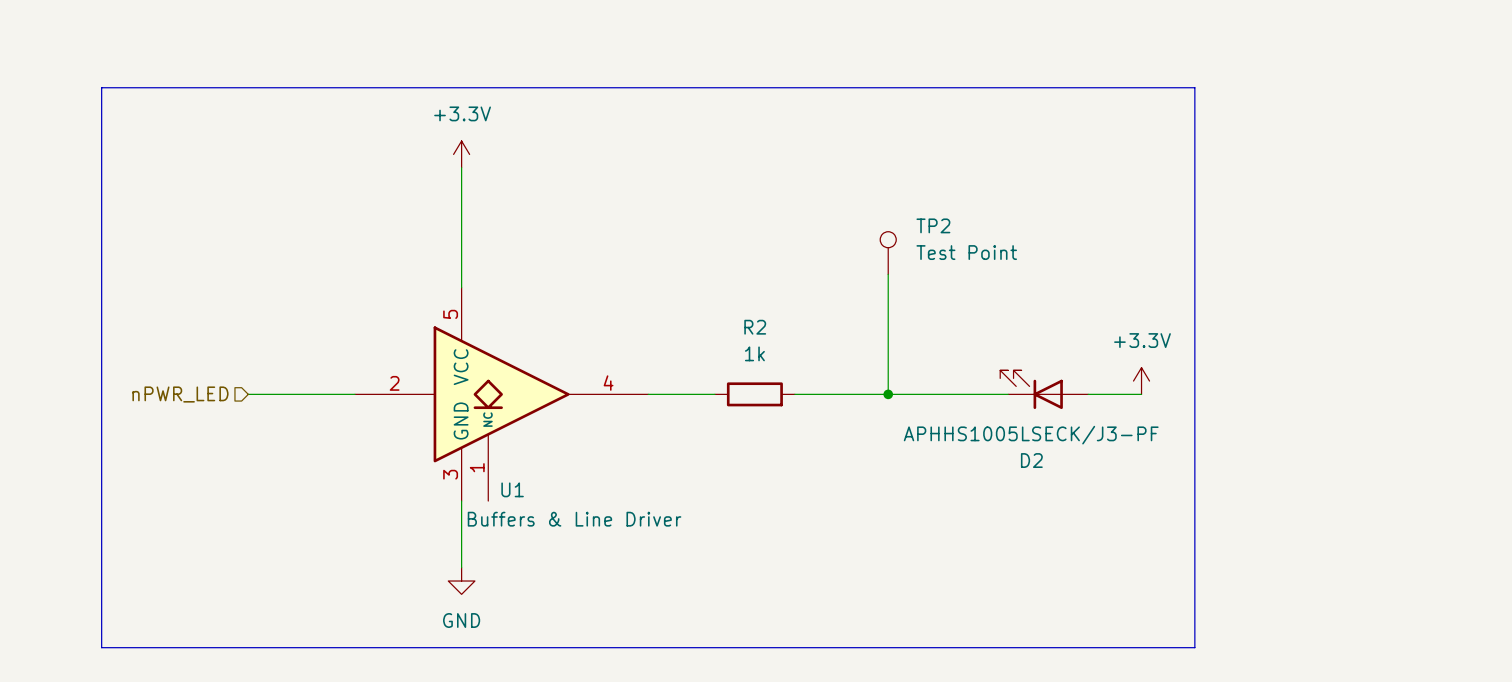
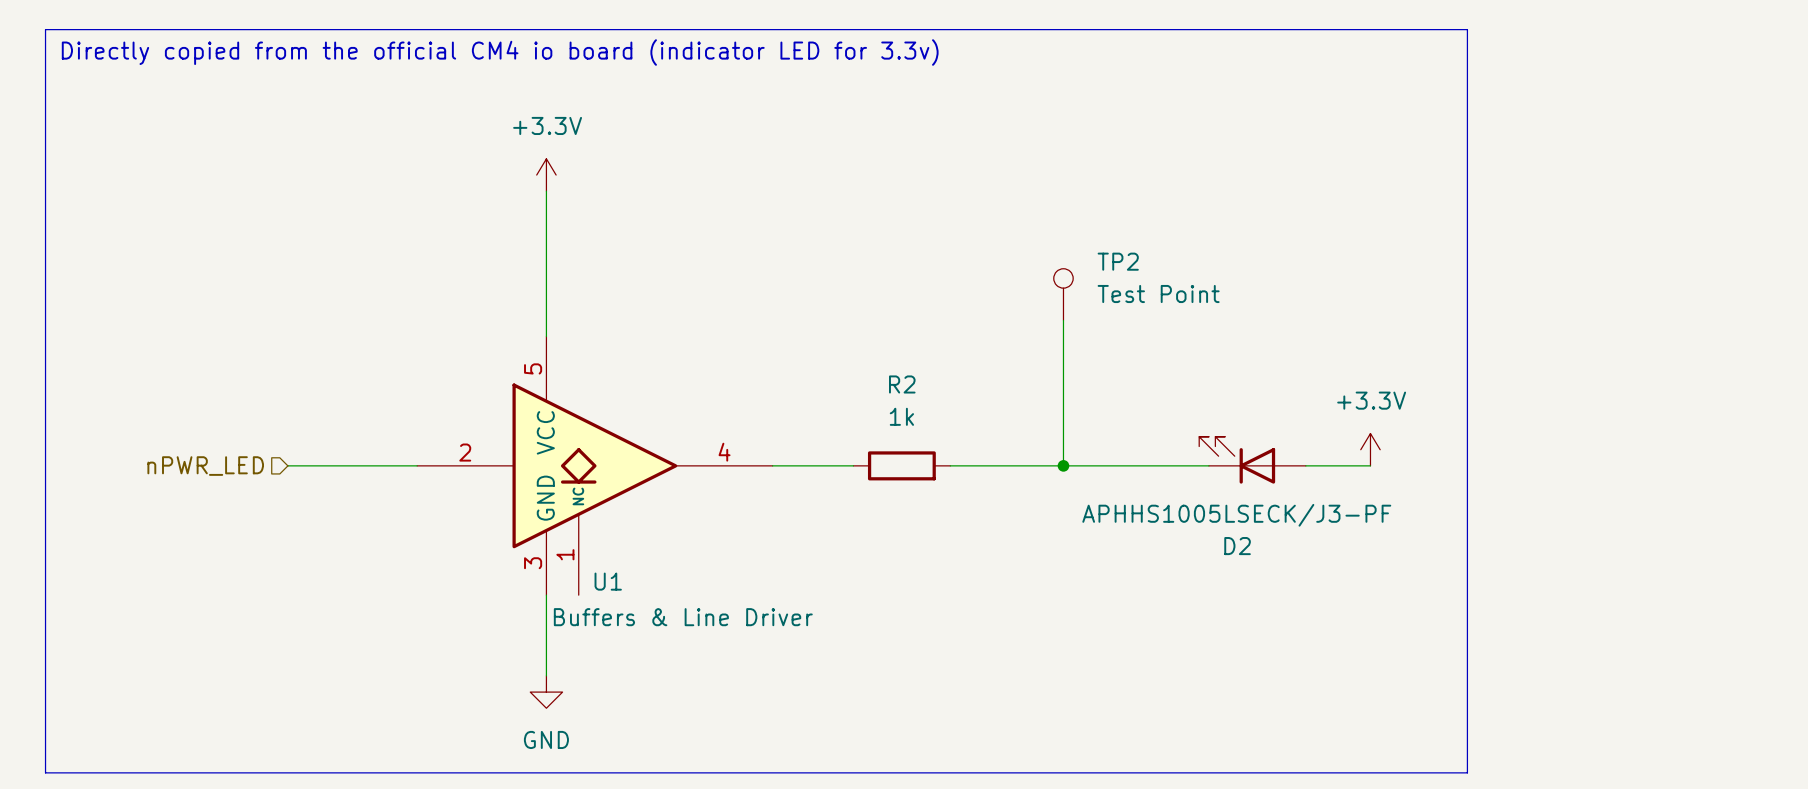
text: none -> Directly copied from the official CM4 io board (indicator LED for 3.3v) (500, 52)
line: (101, 647) (101, 87) (1194, 87) (1194, 647) -> (110, 772) (45, 772) (45, 29) (1467, 29) (1467, 772) (1435, 772)

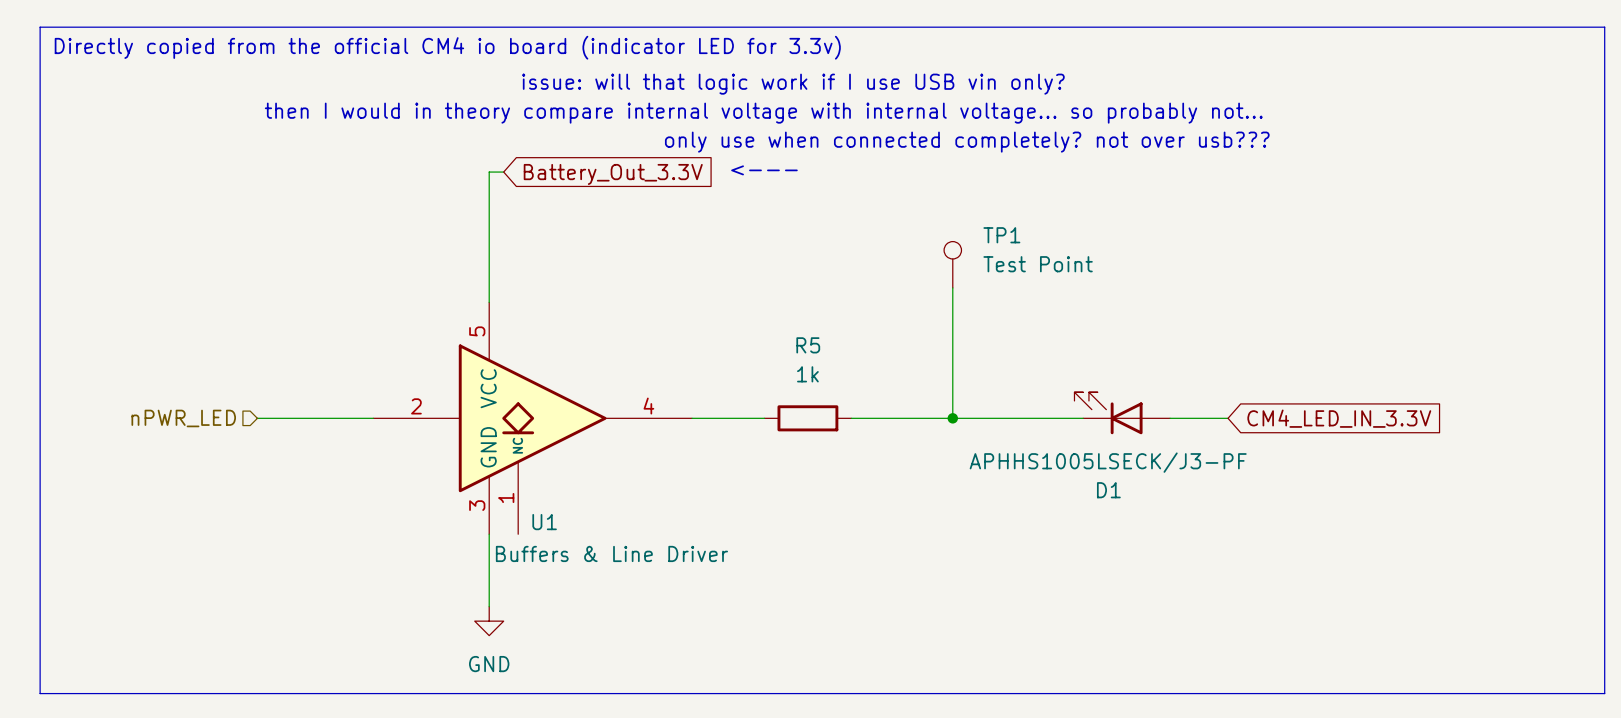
line: (1467, 29) (1467, 772) -> (1314, 27) (1604, 27) (1604, 693) (1314, 693)
text: none -> issue: will that logic work if I use USB vin only? (793, 84)
text: none -> then I would in theory compare internal voltage with internal voltage... so probably not... (763, 113)
text: none -> only use when connected completely? not over usb??? (967, 142)
power symbol: +3.3V (546, 175) -> none
text: none -> <--- (764, 170)
wire: none -> (489, 172) (503, 172)
global label: none -> Battery_Out_3.3V (613, 174)
TP2 name: TP2 (1118, 261) -> TP1 (1001, 235)
R2 name: R2 (902, 384) -> R5 (808, 345)
power symbol: +3.3V (1370, 449) -> none
global label: none -> CM4_LED_IN_3.3V (1339, 418)
D2 name: D2 (1237, 546) -> D1 (1108, 490)

